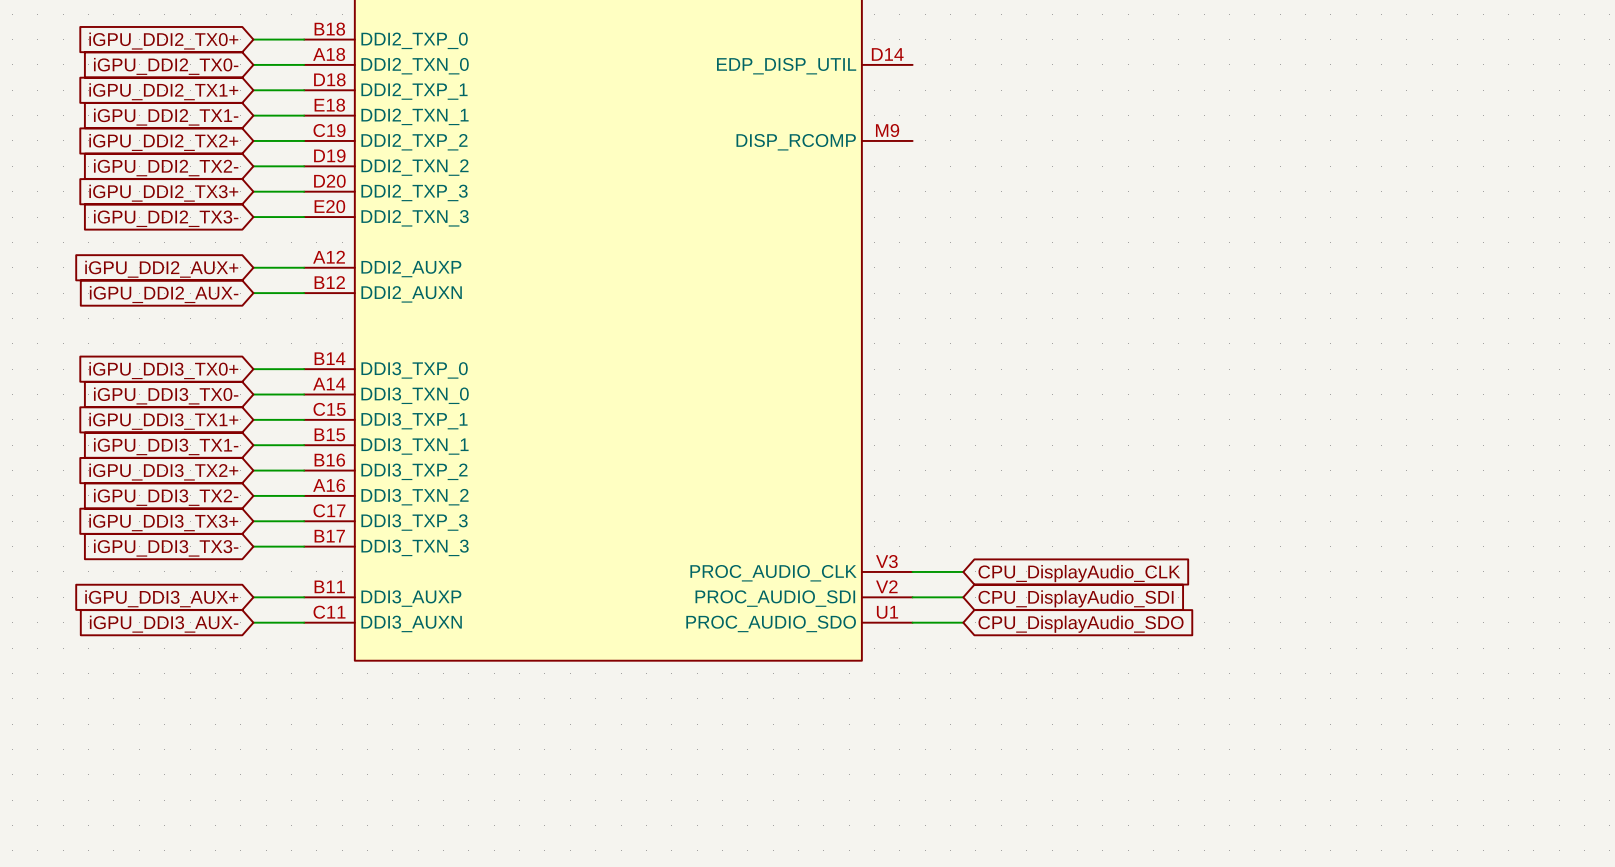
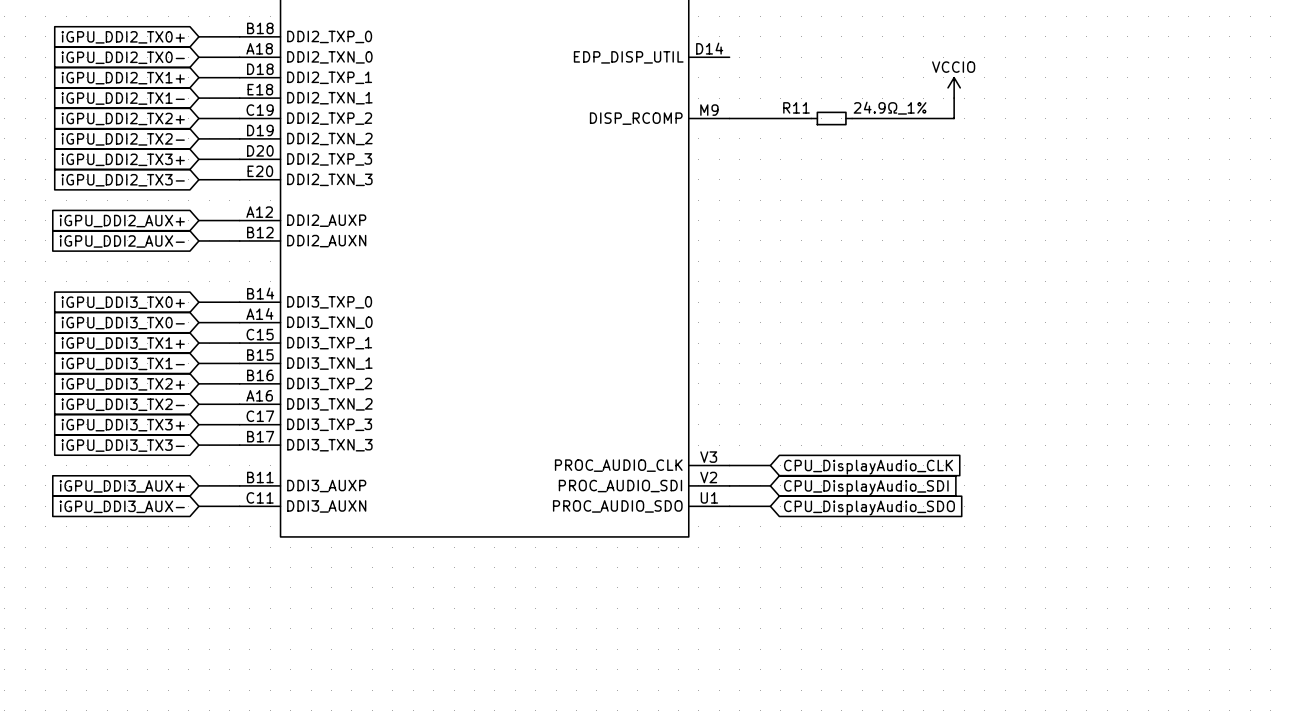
power symbol: none -> VCCIO (954, 87)
wire: none -> (954, 98) (954, 118) (852, 118)
wire: none -> (729, 118) (811, 118)
R11: none -> 24.9Ω_1% (831, 118)

